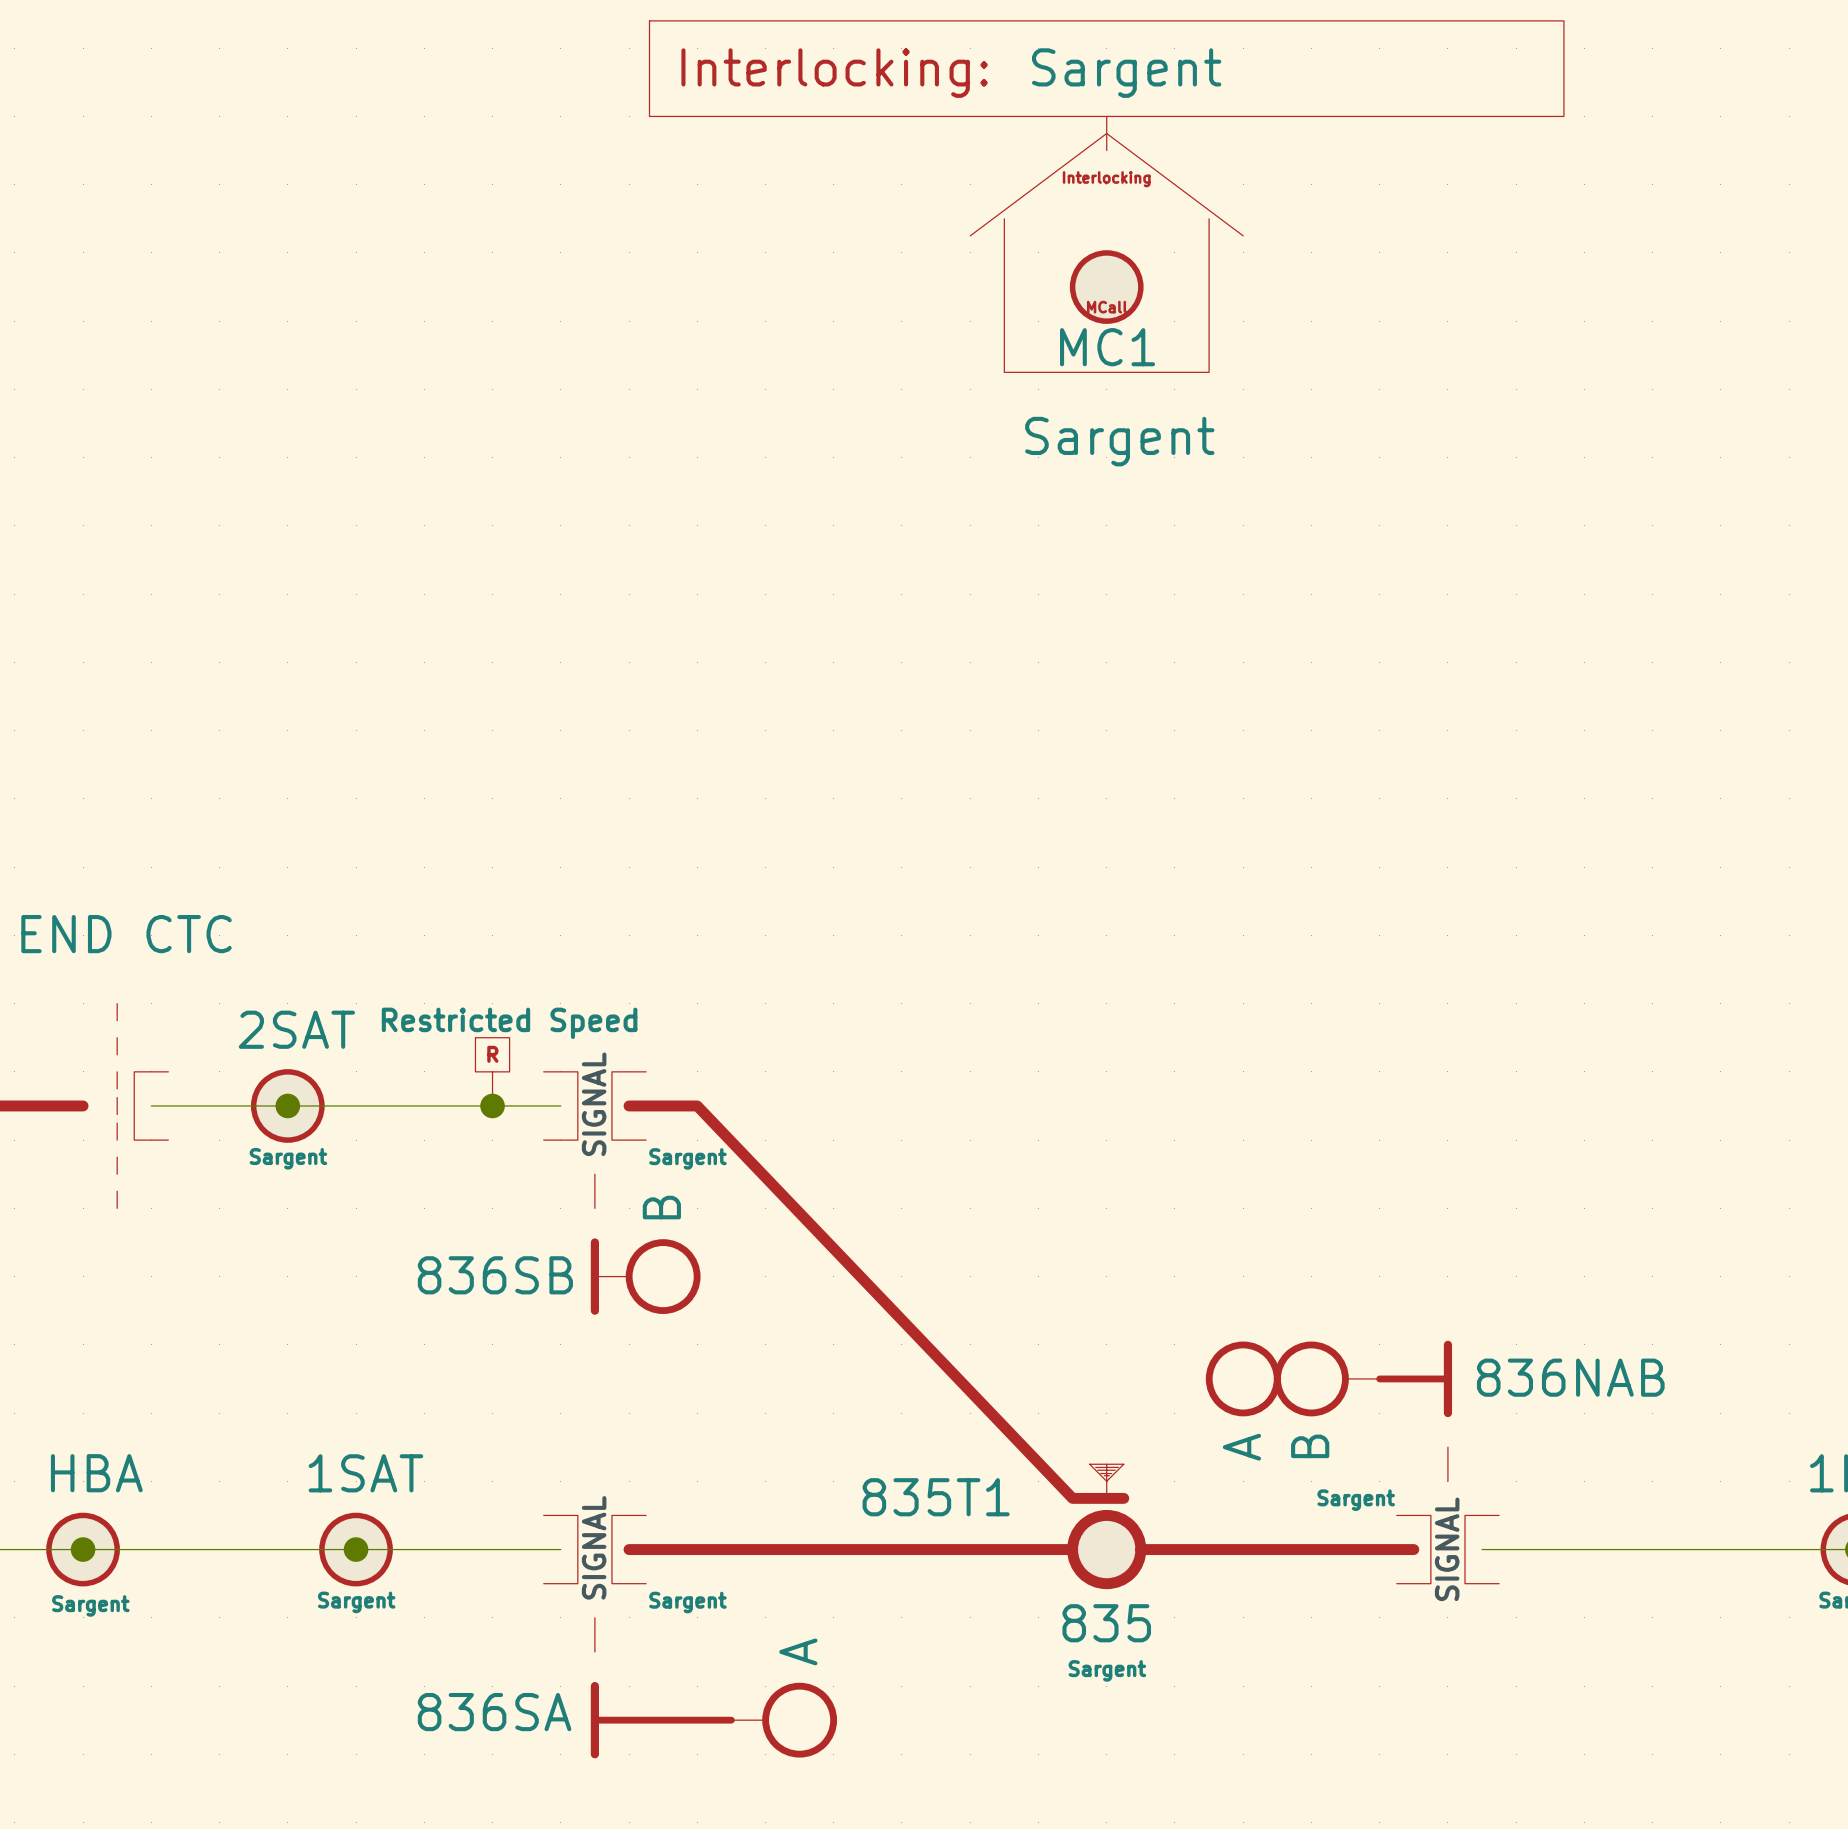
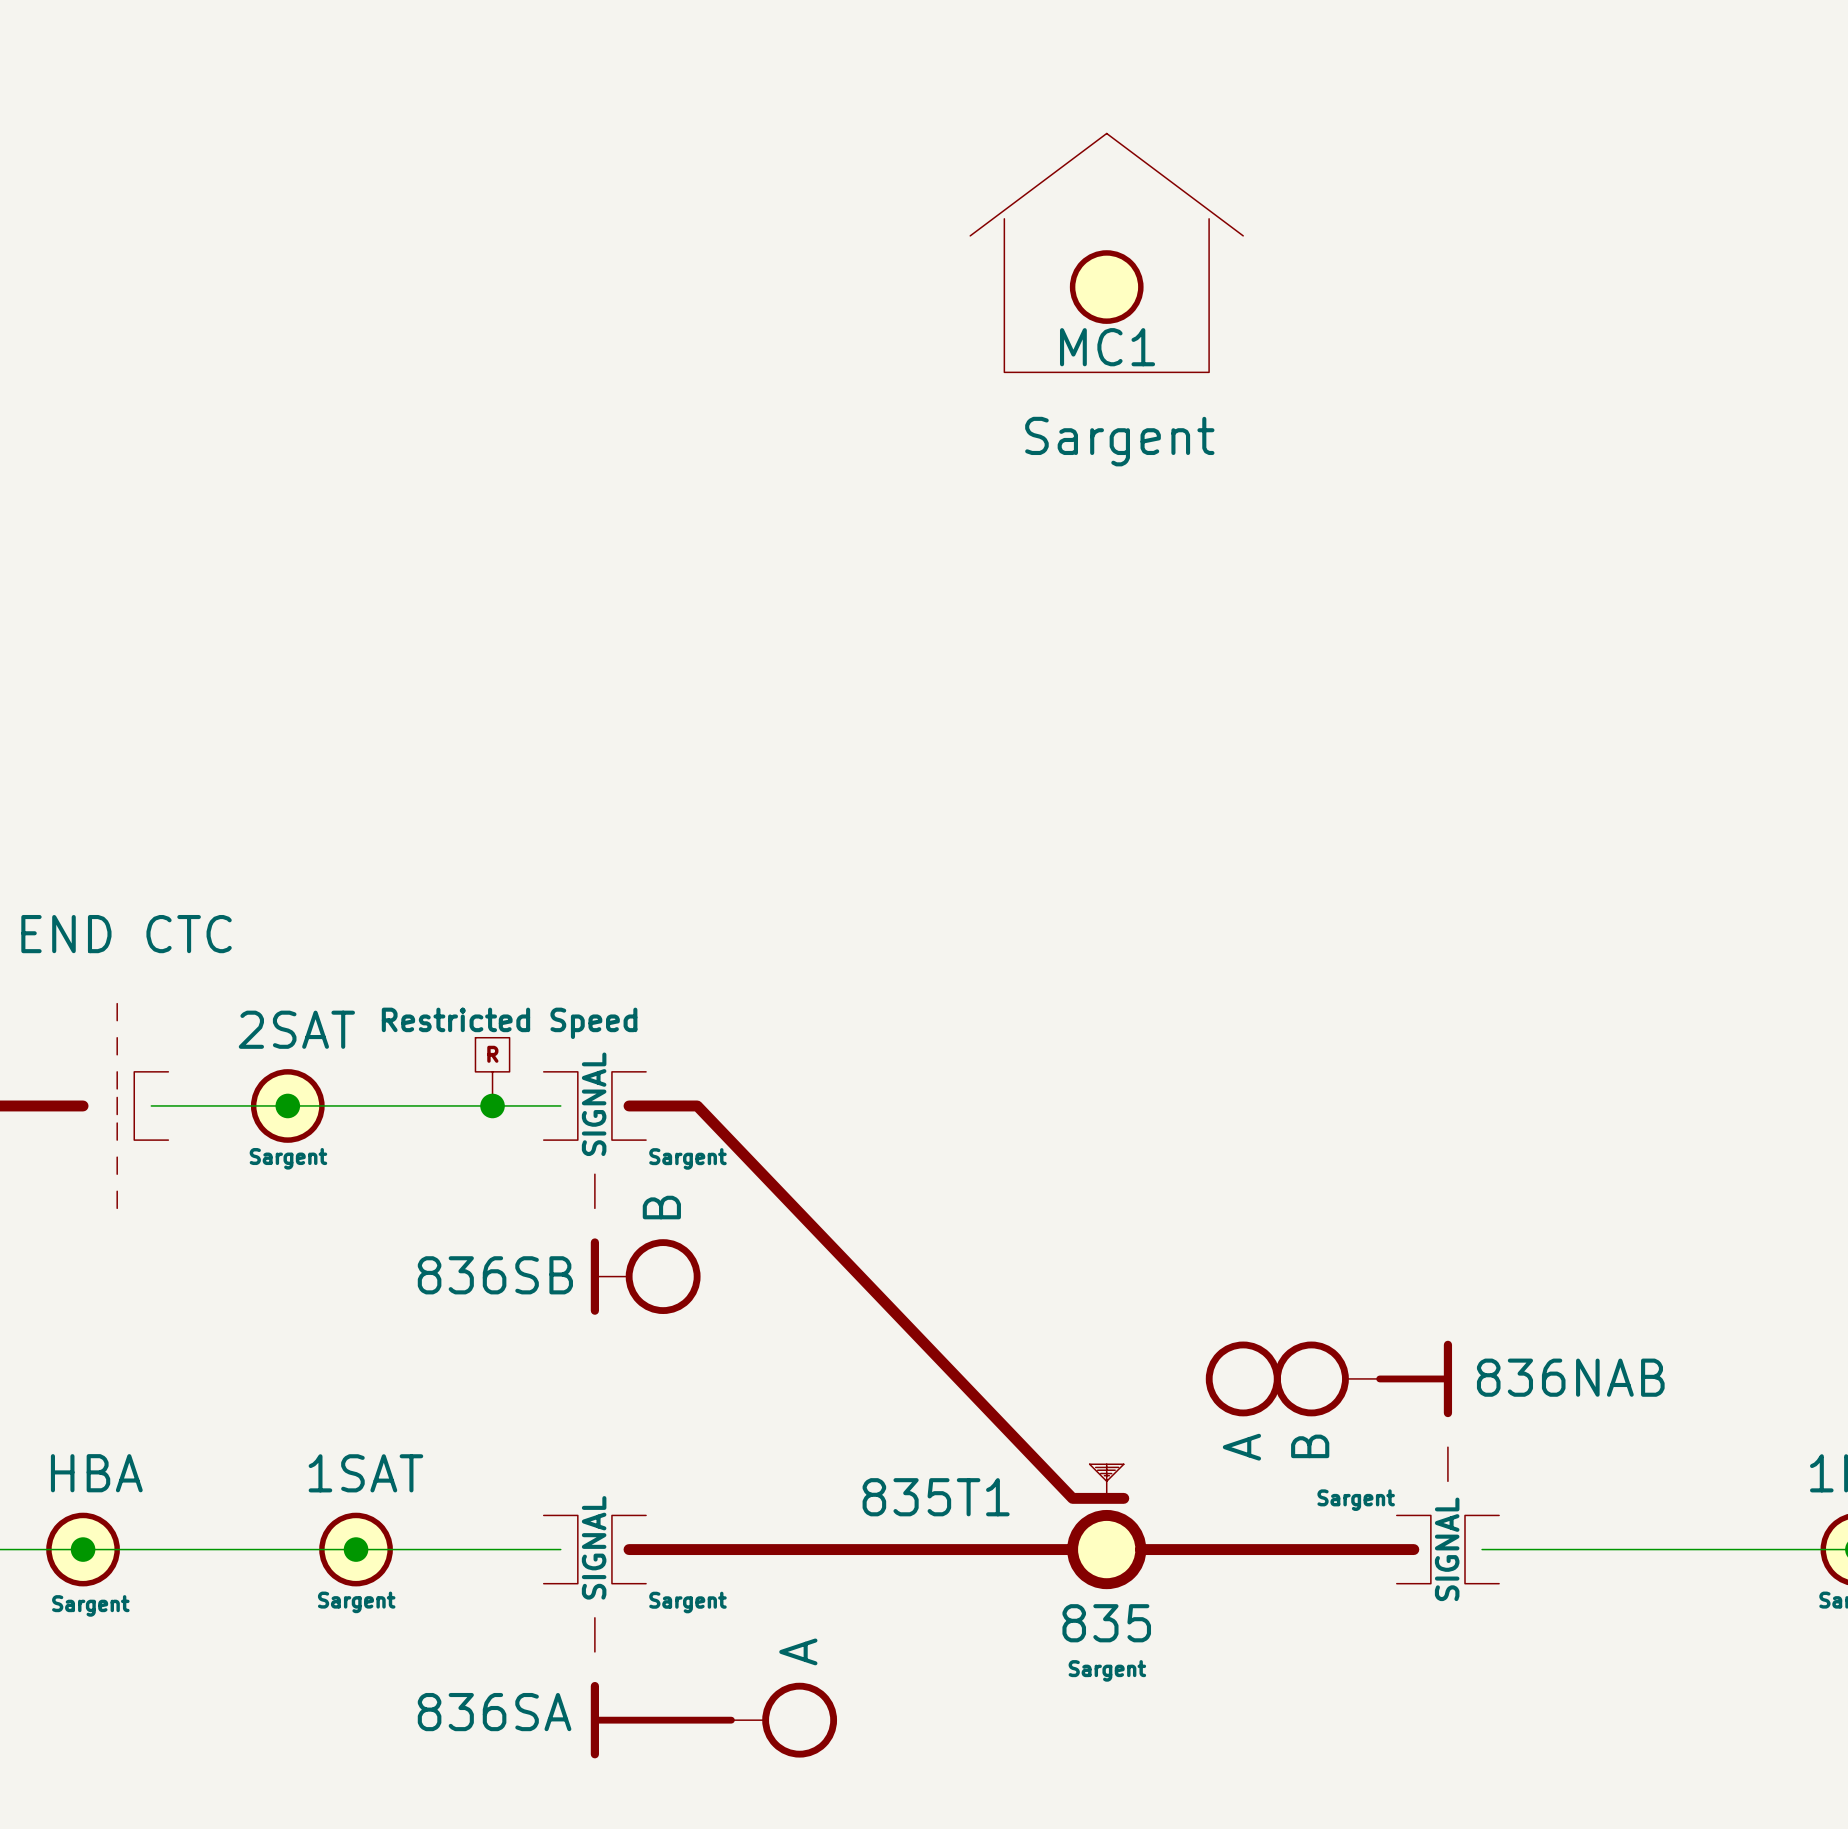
part: Sargent (1106, 85) -> none
part text: Interlocking (1106, 179) -> none
part text: MCall (1107, 307) -> none

